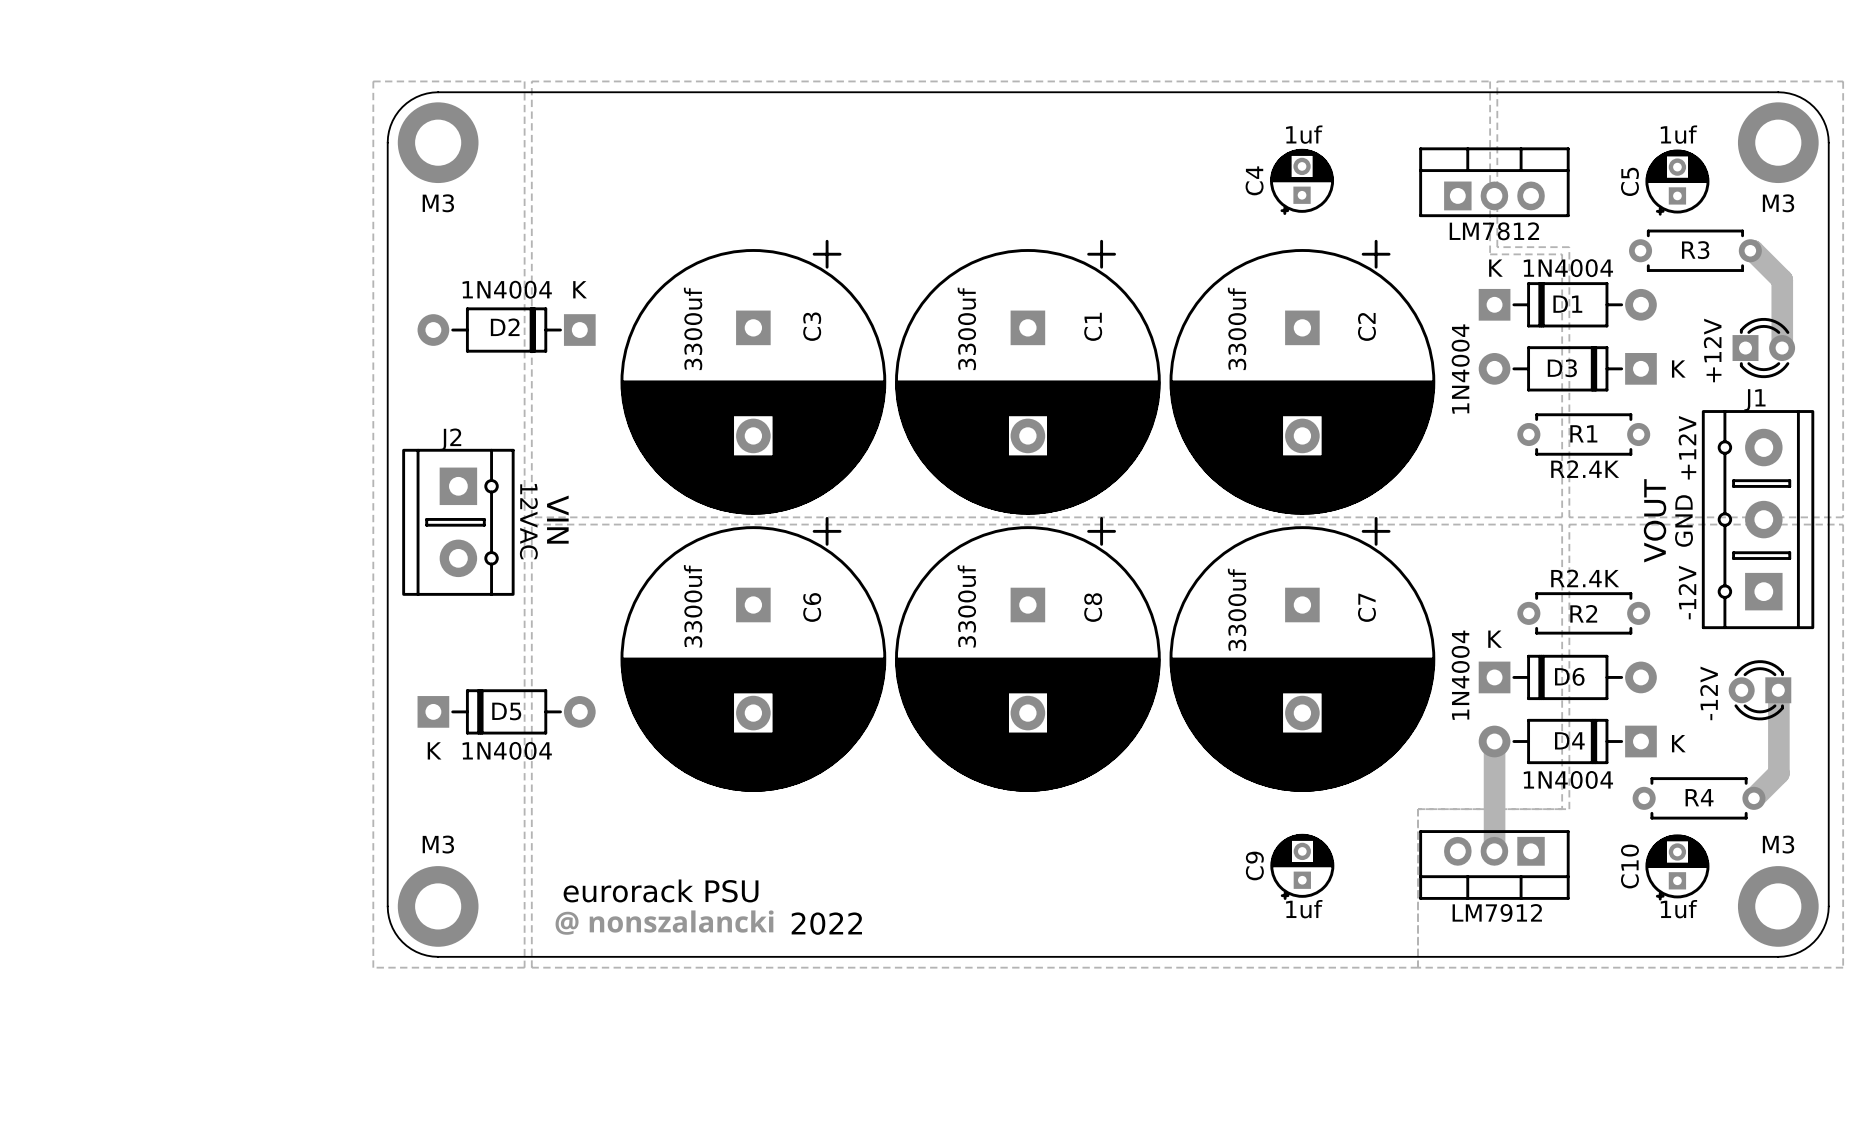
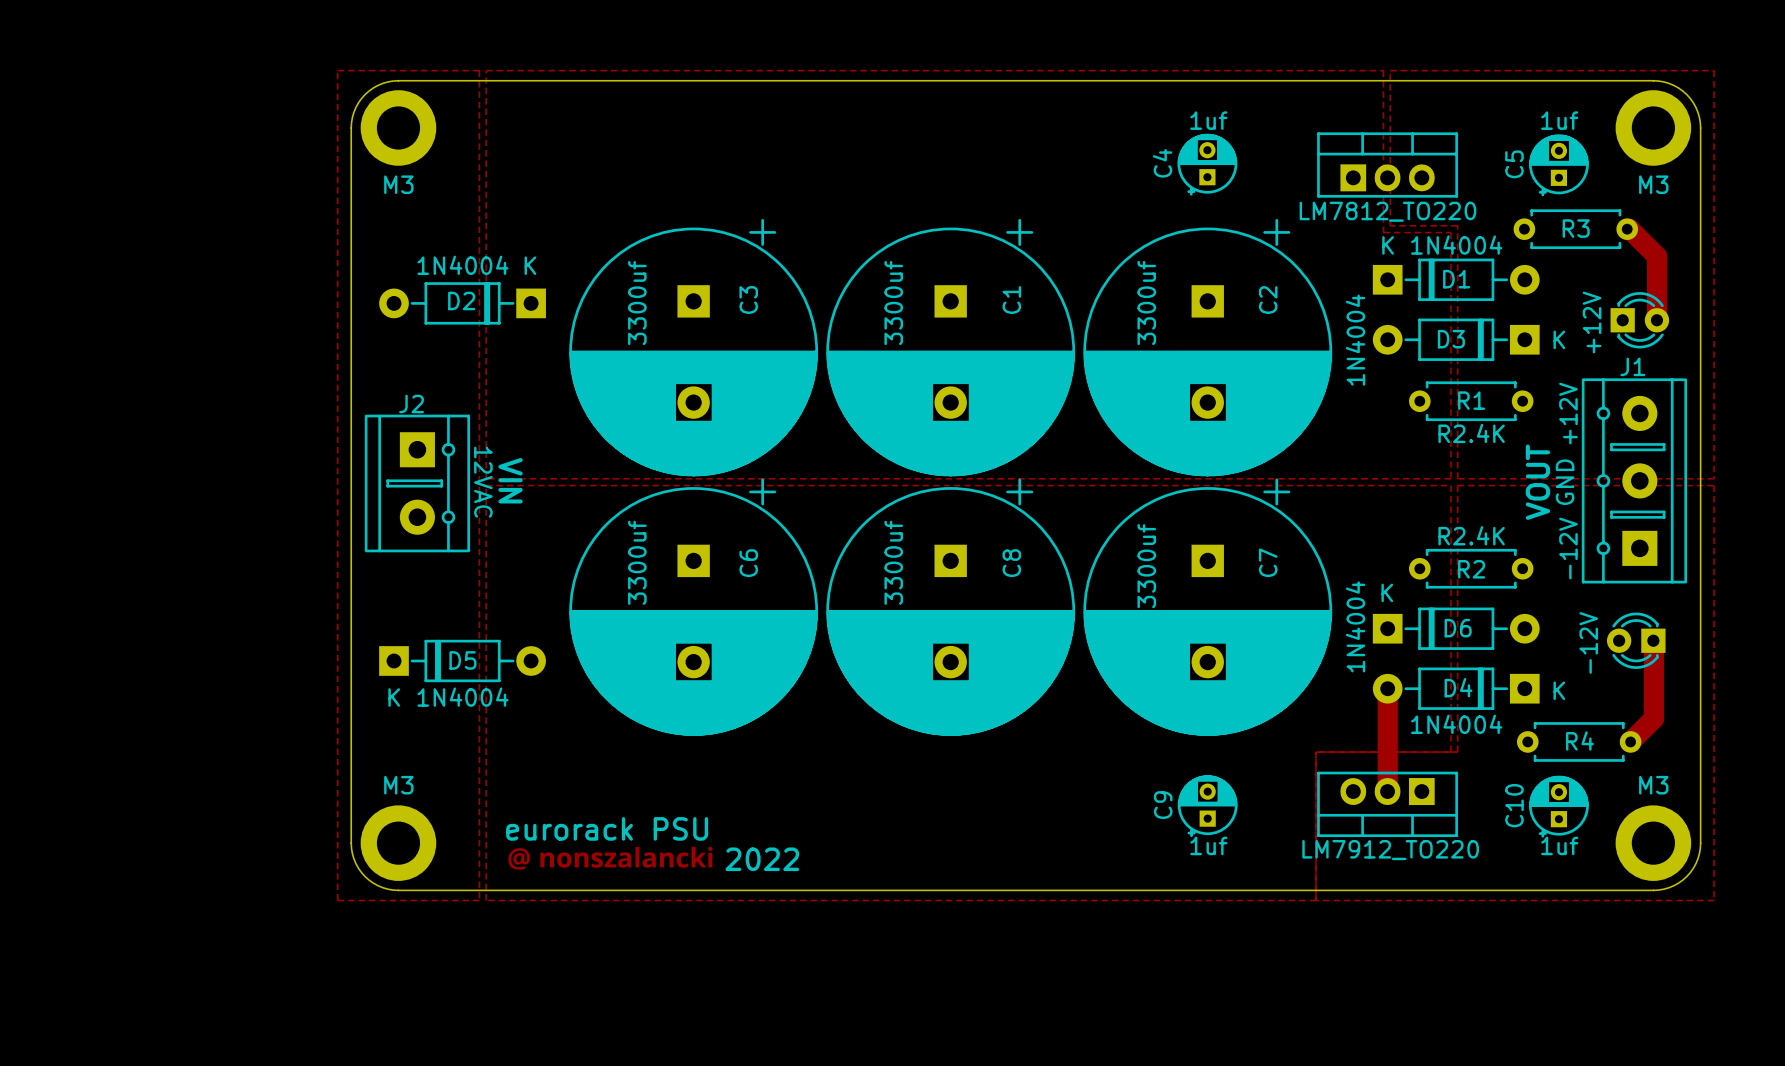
part value: LM7812 (1494, 231) -> LM7812_TO220 (1387, 211)
part value: LM7912 (1497, 913) -> LM7912_TO220 (1390, 850)

